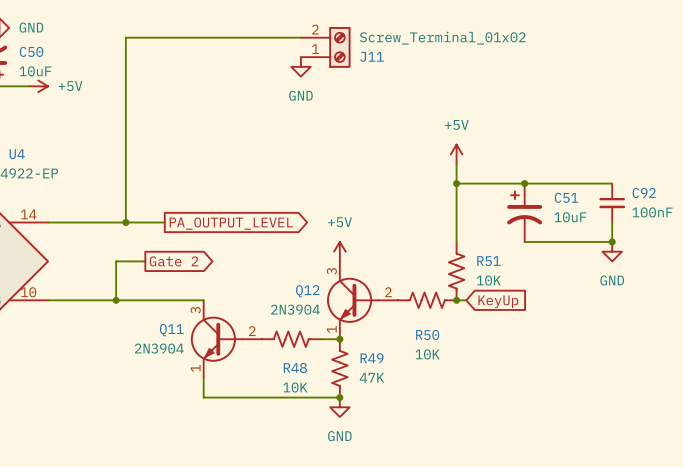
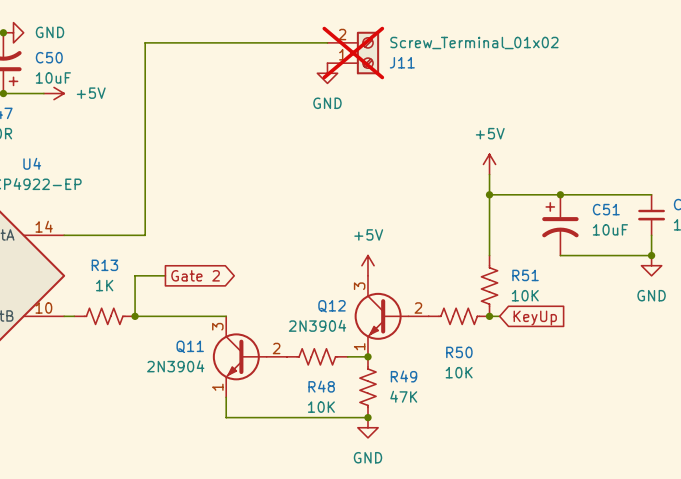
J11 do-not-place cross: none -> (353, 53)
wire: (125, 222) (164, 222) -> none
junction: (125, 222) -> none
global label: PA_OUTPUT_LEVEL (231, 223) -> none
R13: none -> 1K (104, 316)

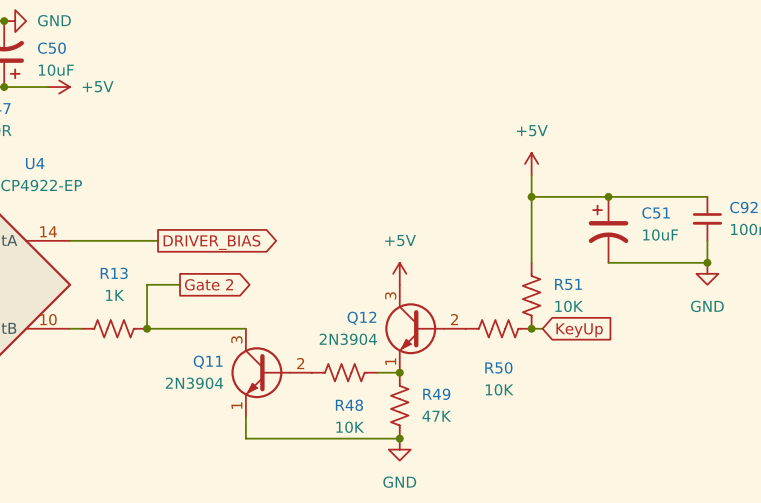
wire: (327, 42) (145, 42) (145, 235) -> none
J11: Screw_Terminal_01x02 (353, 53) -> none
power symbol: GND (327, 73) -> none
global label: none -> DRIVER_BIAS (211, 242)

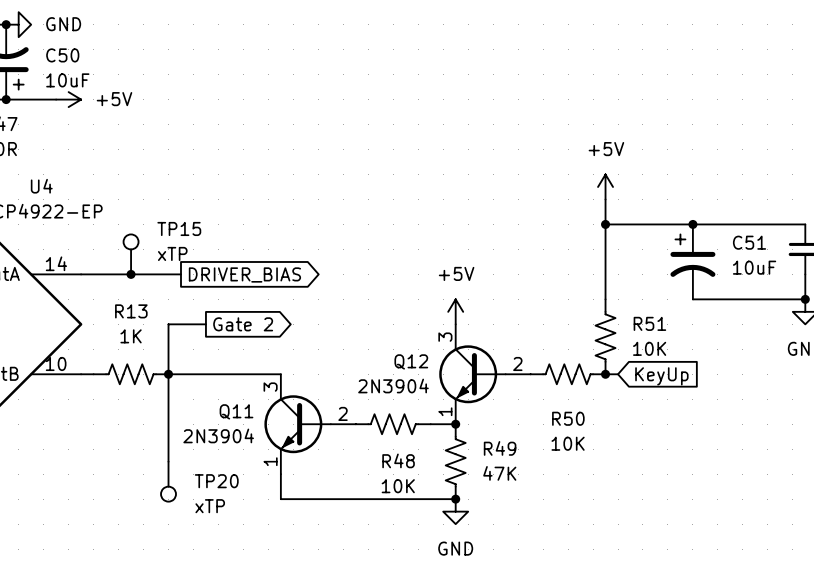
TP15: none -> xTP (131, 254)
junction: none -> (131, 274)
wire: none -> (168, 374) (168, 461)
TP20: none -> xTP (168, 481)

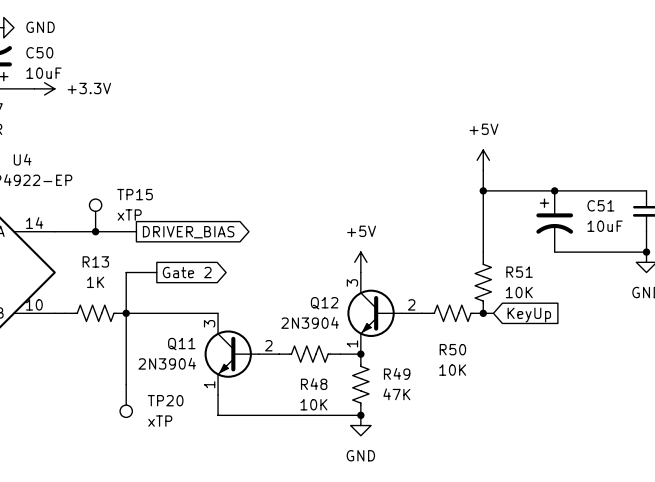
power symbol: +5V (68, 99) -> +3.3V (44, 88)

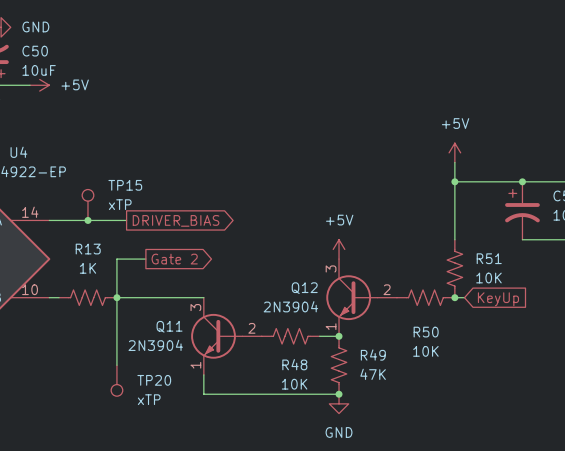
power symbol: +3.3V (44, 88) -> +5V (39, 85)

